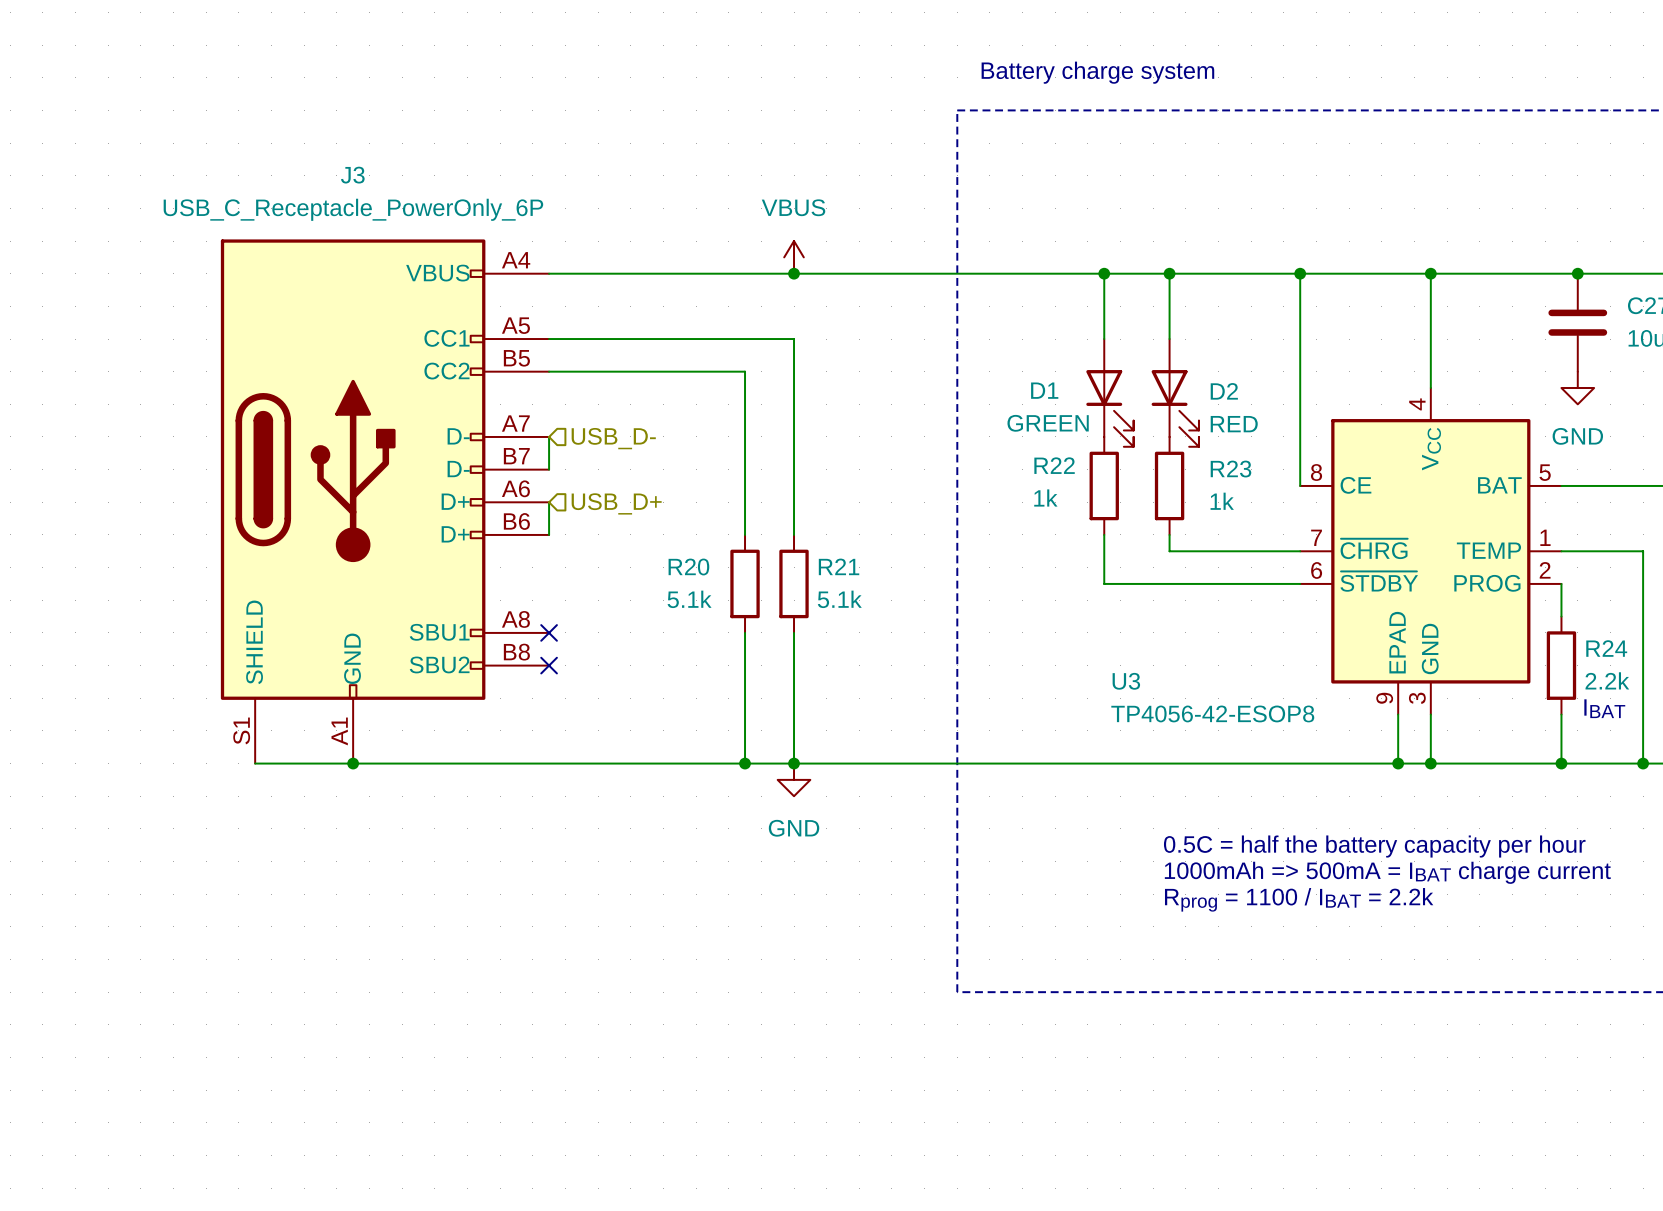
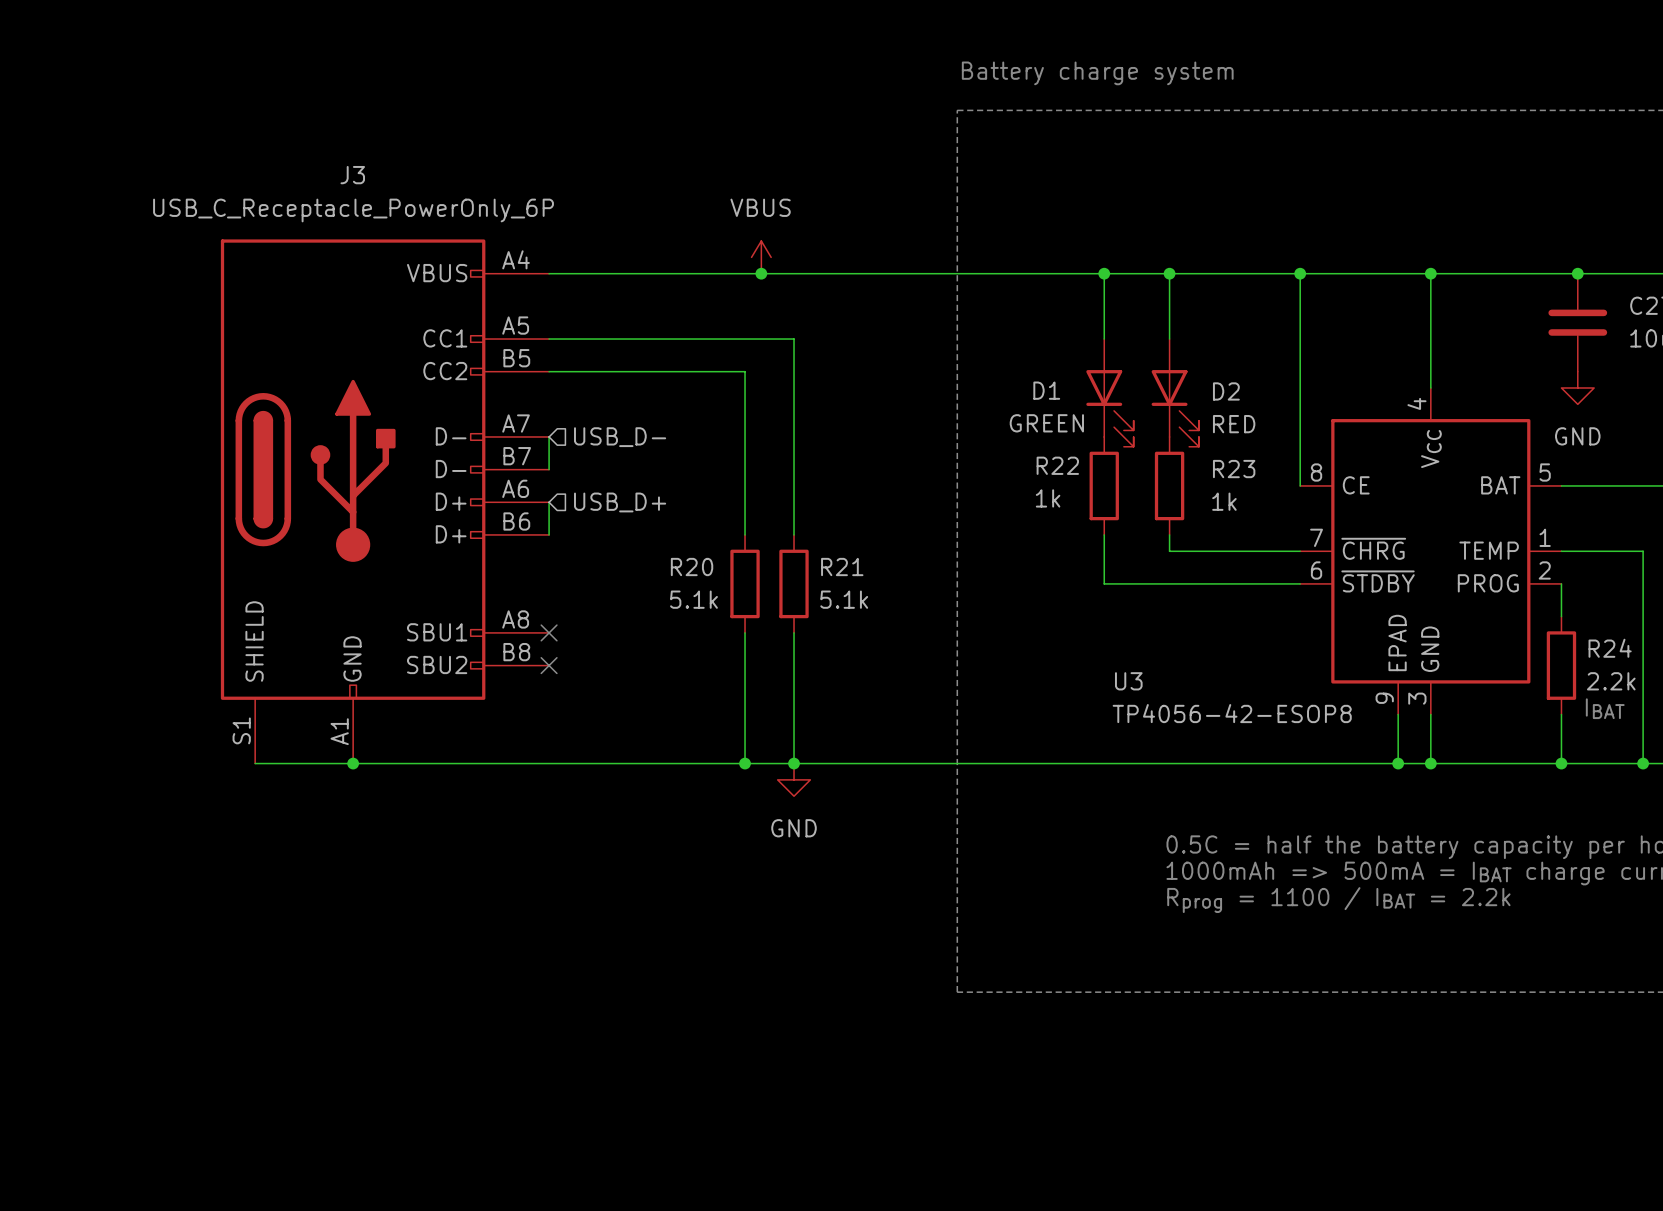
power symbol position: VBUS (794, 257) -> VBUS (761, 257)
junction position: (794, 273) -> (761, 273)

